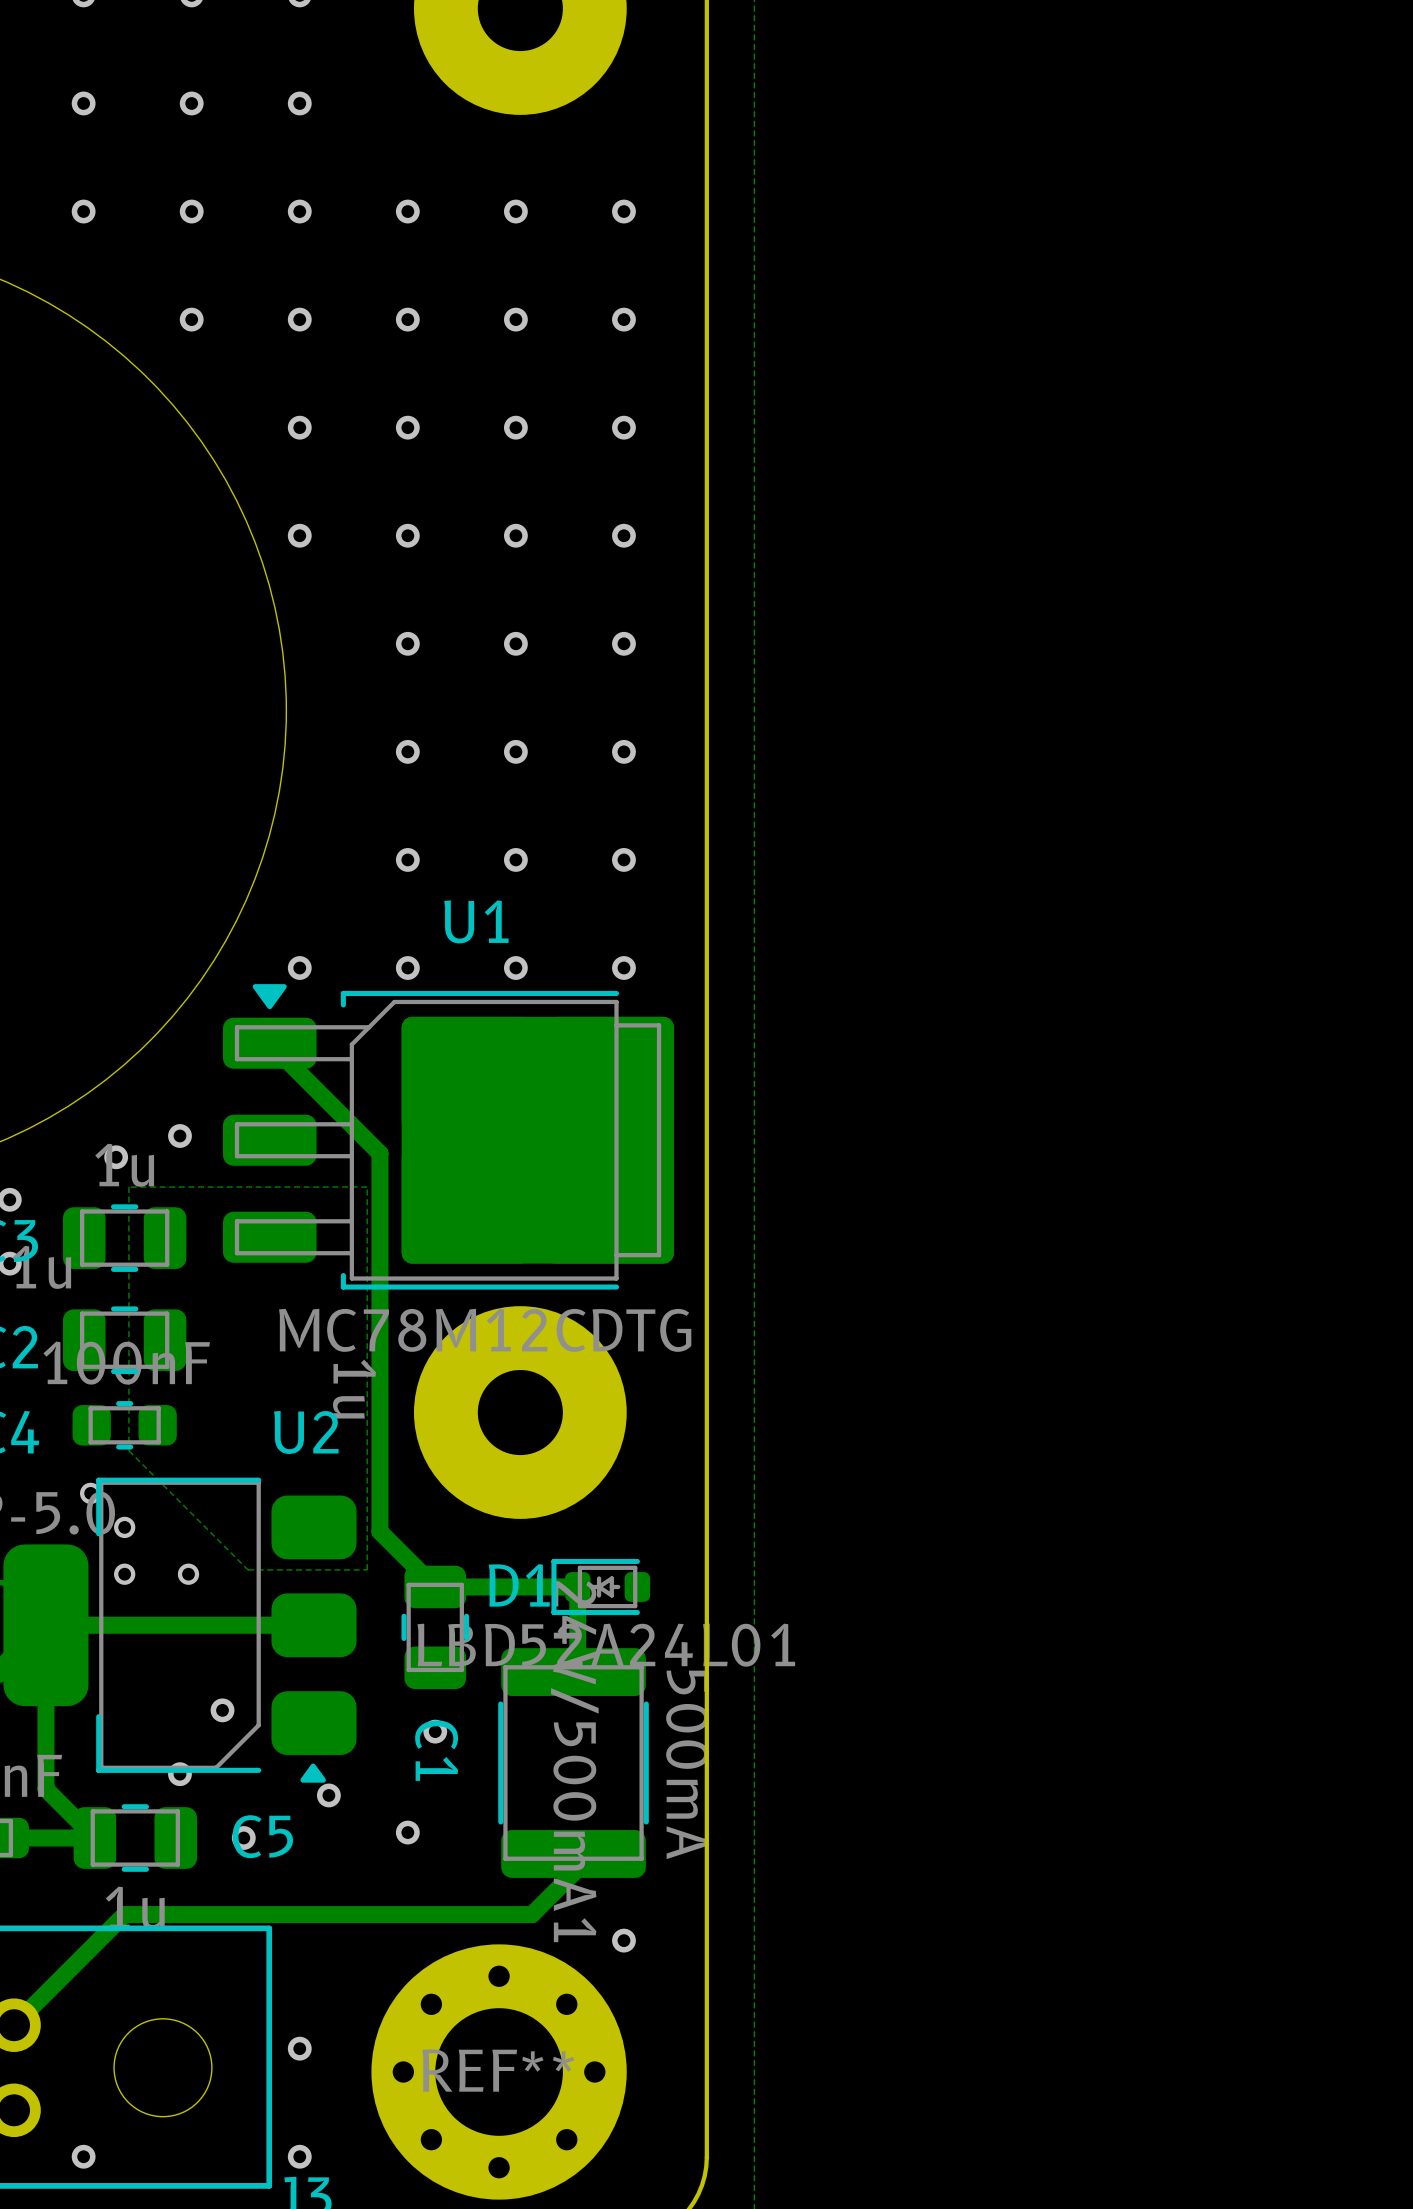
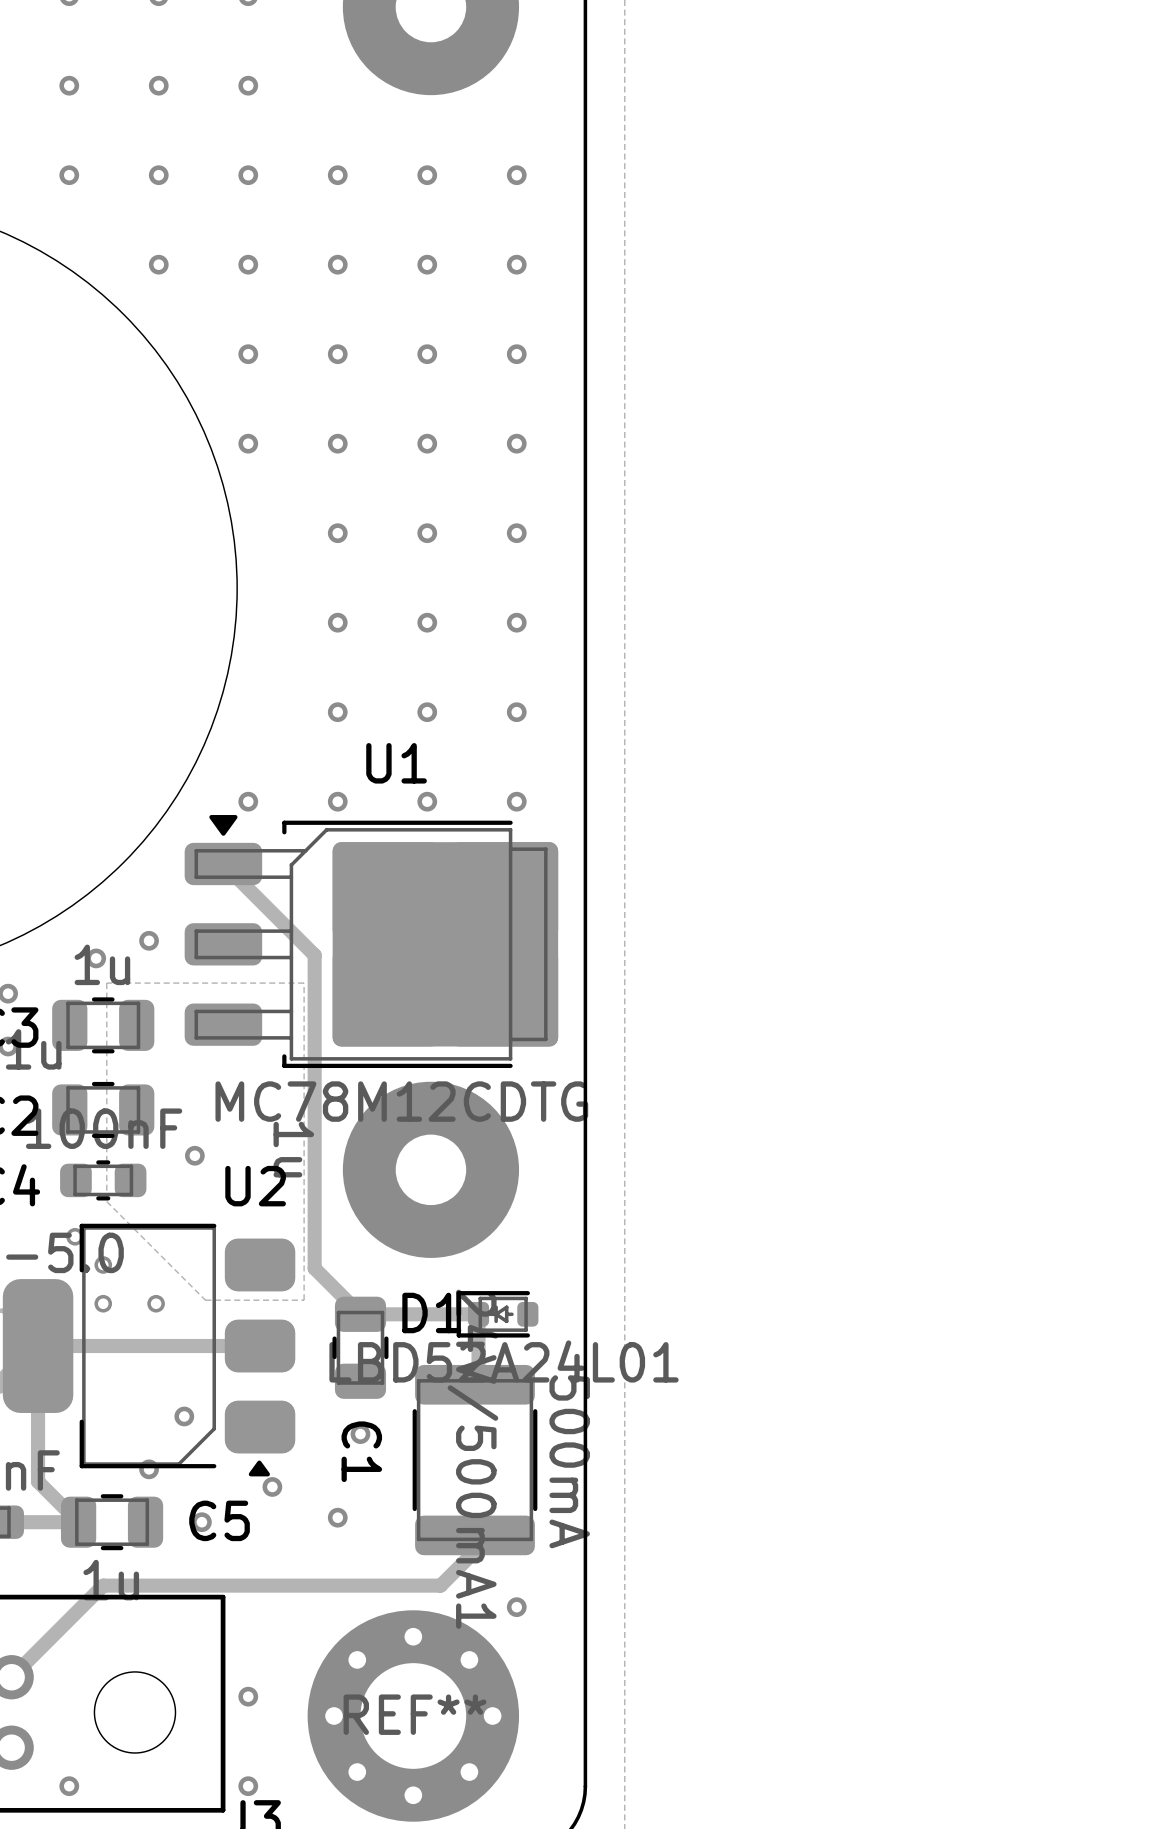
via: none -> (194, 1155)

